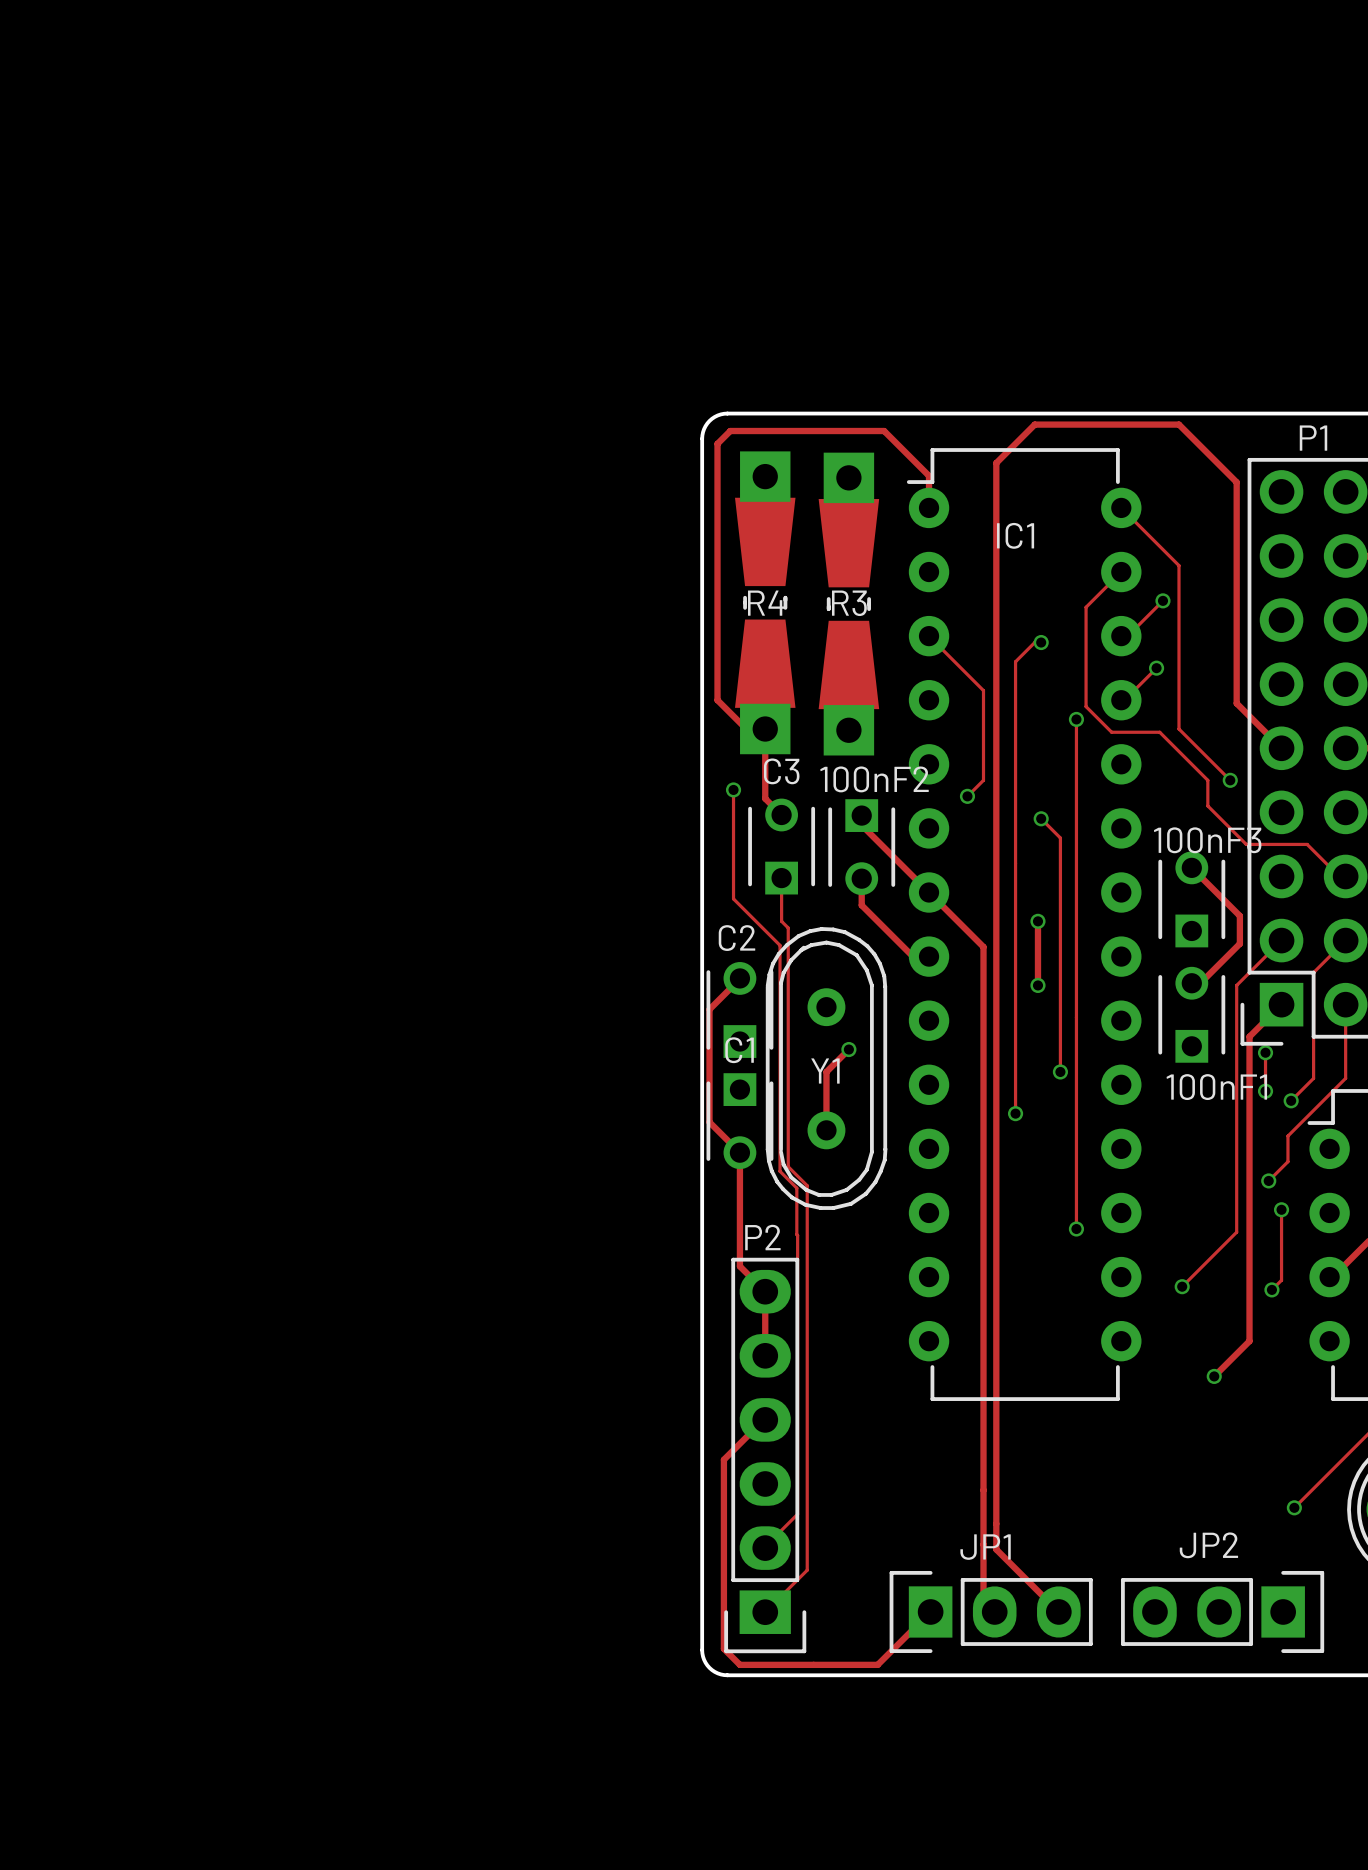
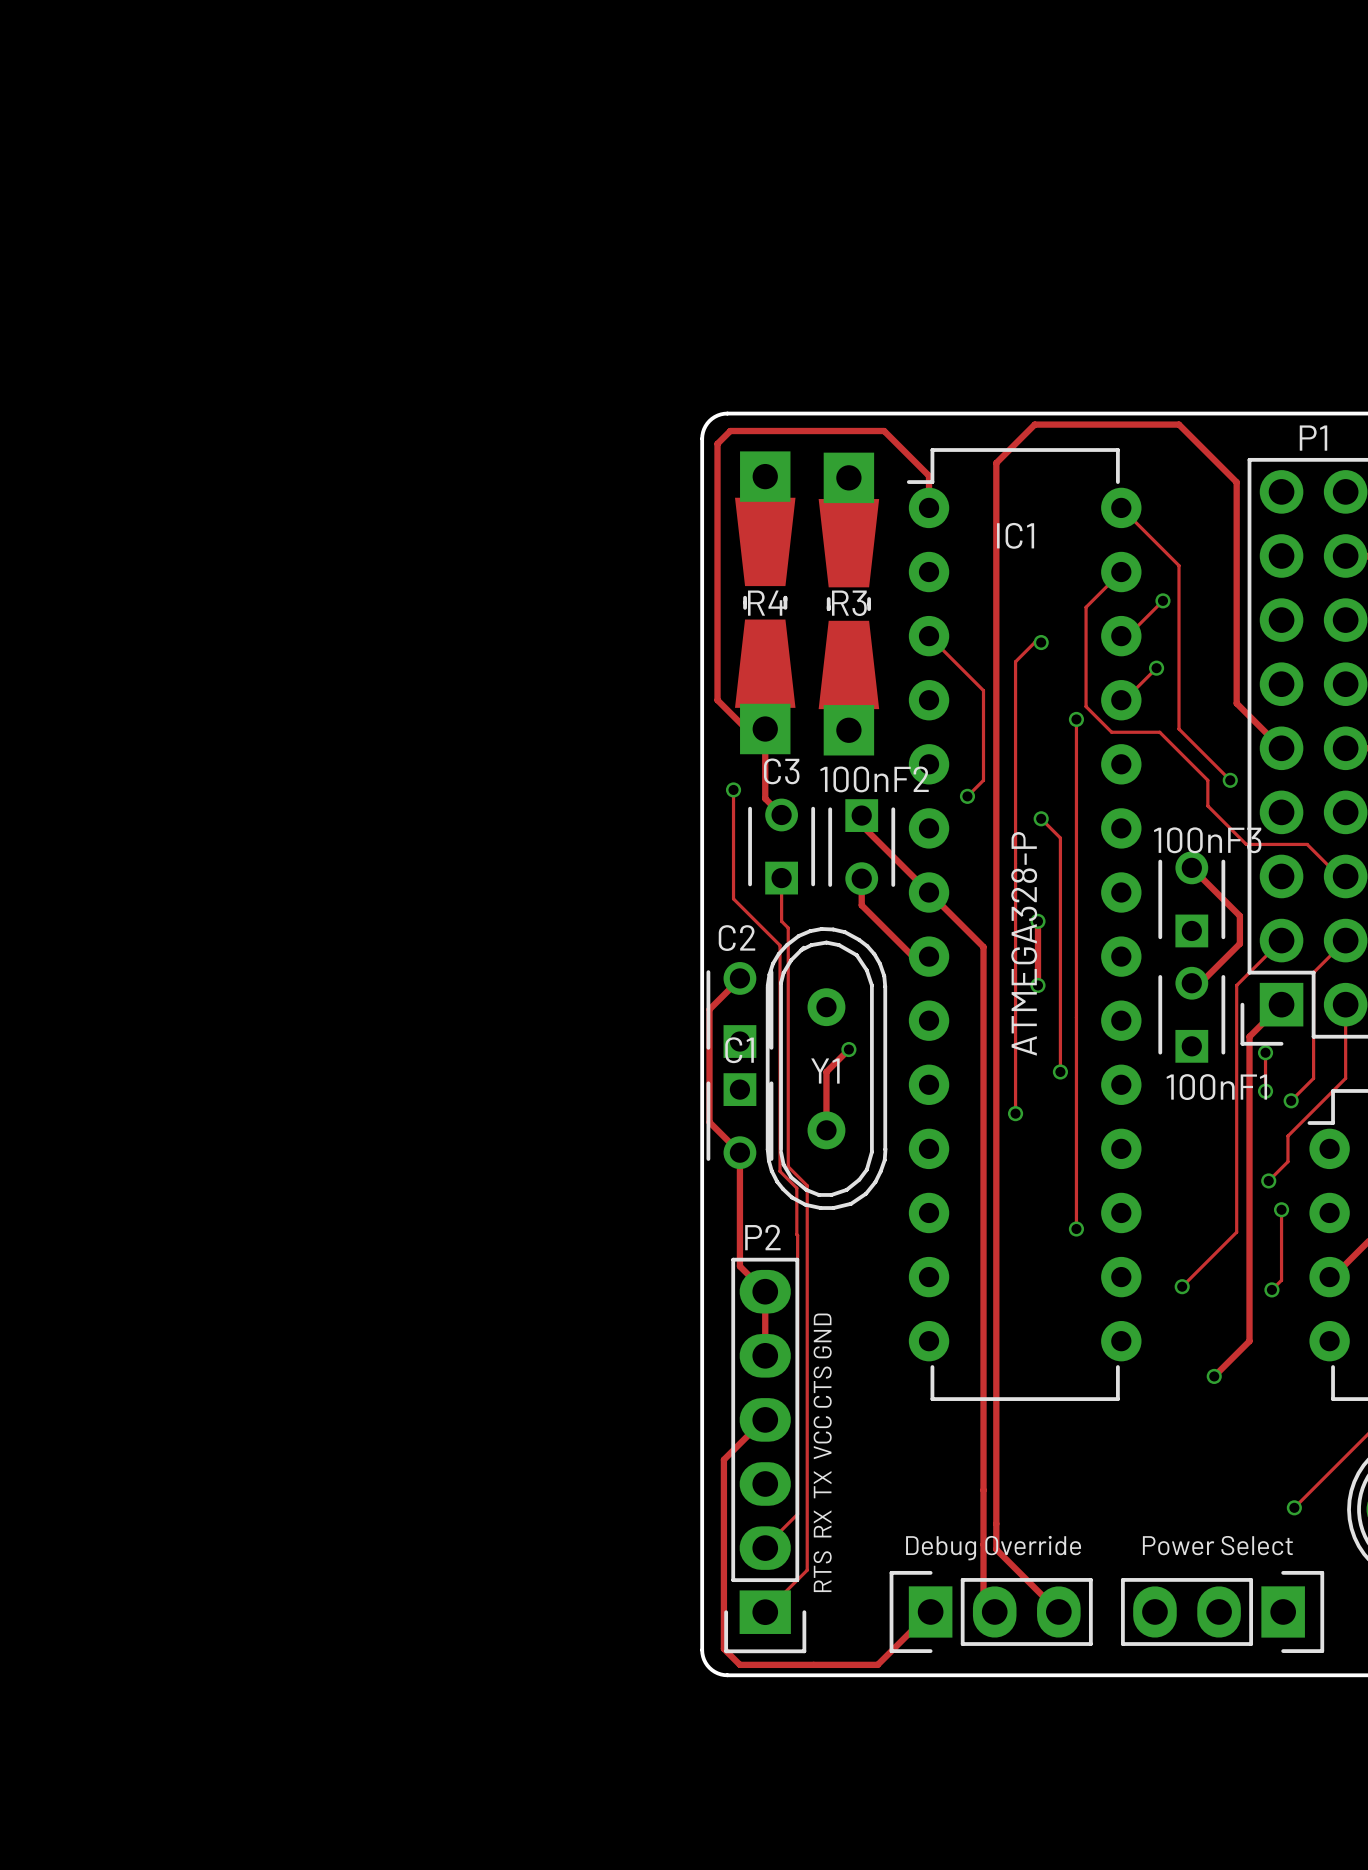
IC1 value: none -> ATMEGA328-P (1024, 943)
text: none -> RTS RX TX VCC CTS GND (822, 1452)
JP2 name: JP2 (1208, 1545) -> Power Select (1217, 1545)
JP1 name: JP1 (985, 1547) -> Debug Override (993, 1548)

